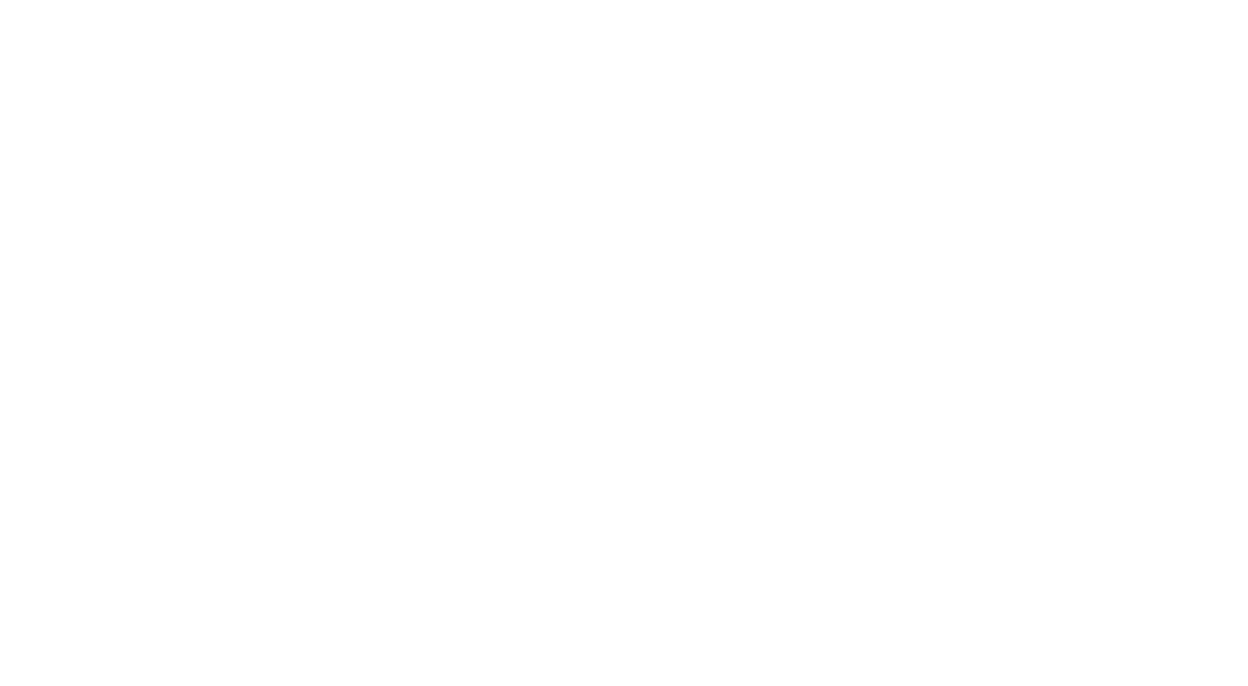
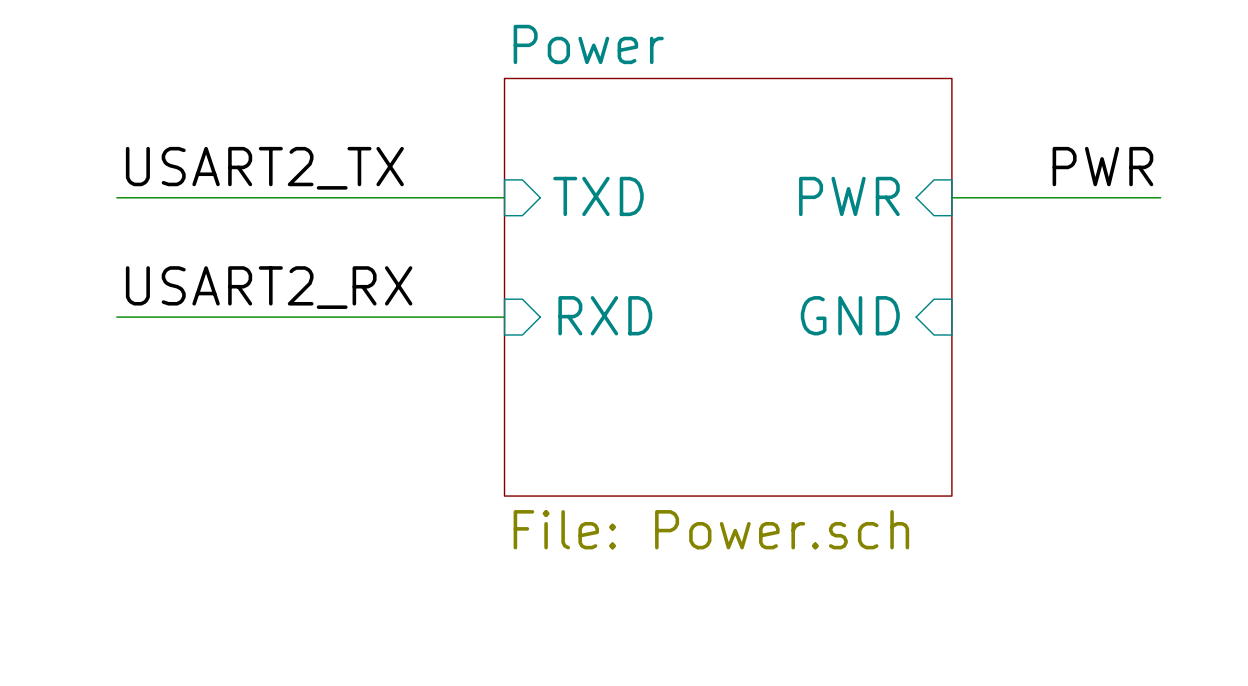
label: none -> PWR (1102, 166)
label: none -> USART2_TX (264, 168)
sheet pin: none -> TXD (598, 196)
sheet pin: none -> PWR (849, 196)
wire: none -> (116, 197) (504, 197)
wire: none -> (951, 197) (1160, 197)
label: none -> USART2_RX (269, 287)
sheet Power: none -> File: Power.sch (728, 287)
sheet pin: none -> RXD (605, 315)
sheet pin: none -> GND (850, 315)
wire: none -> (116, 317) (504, 317)

